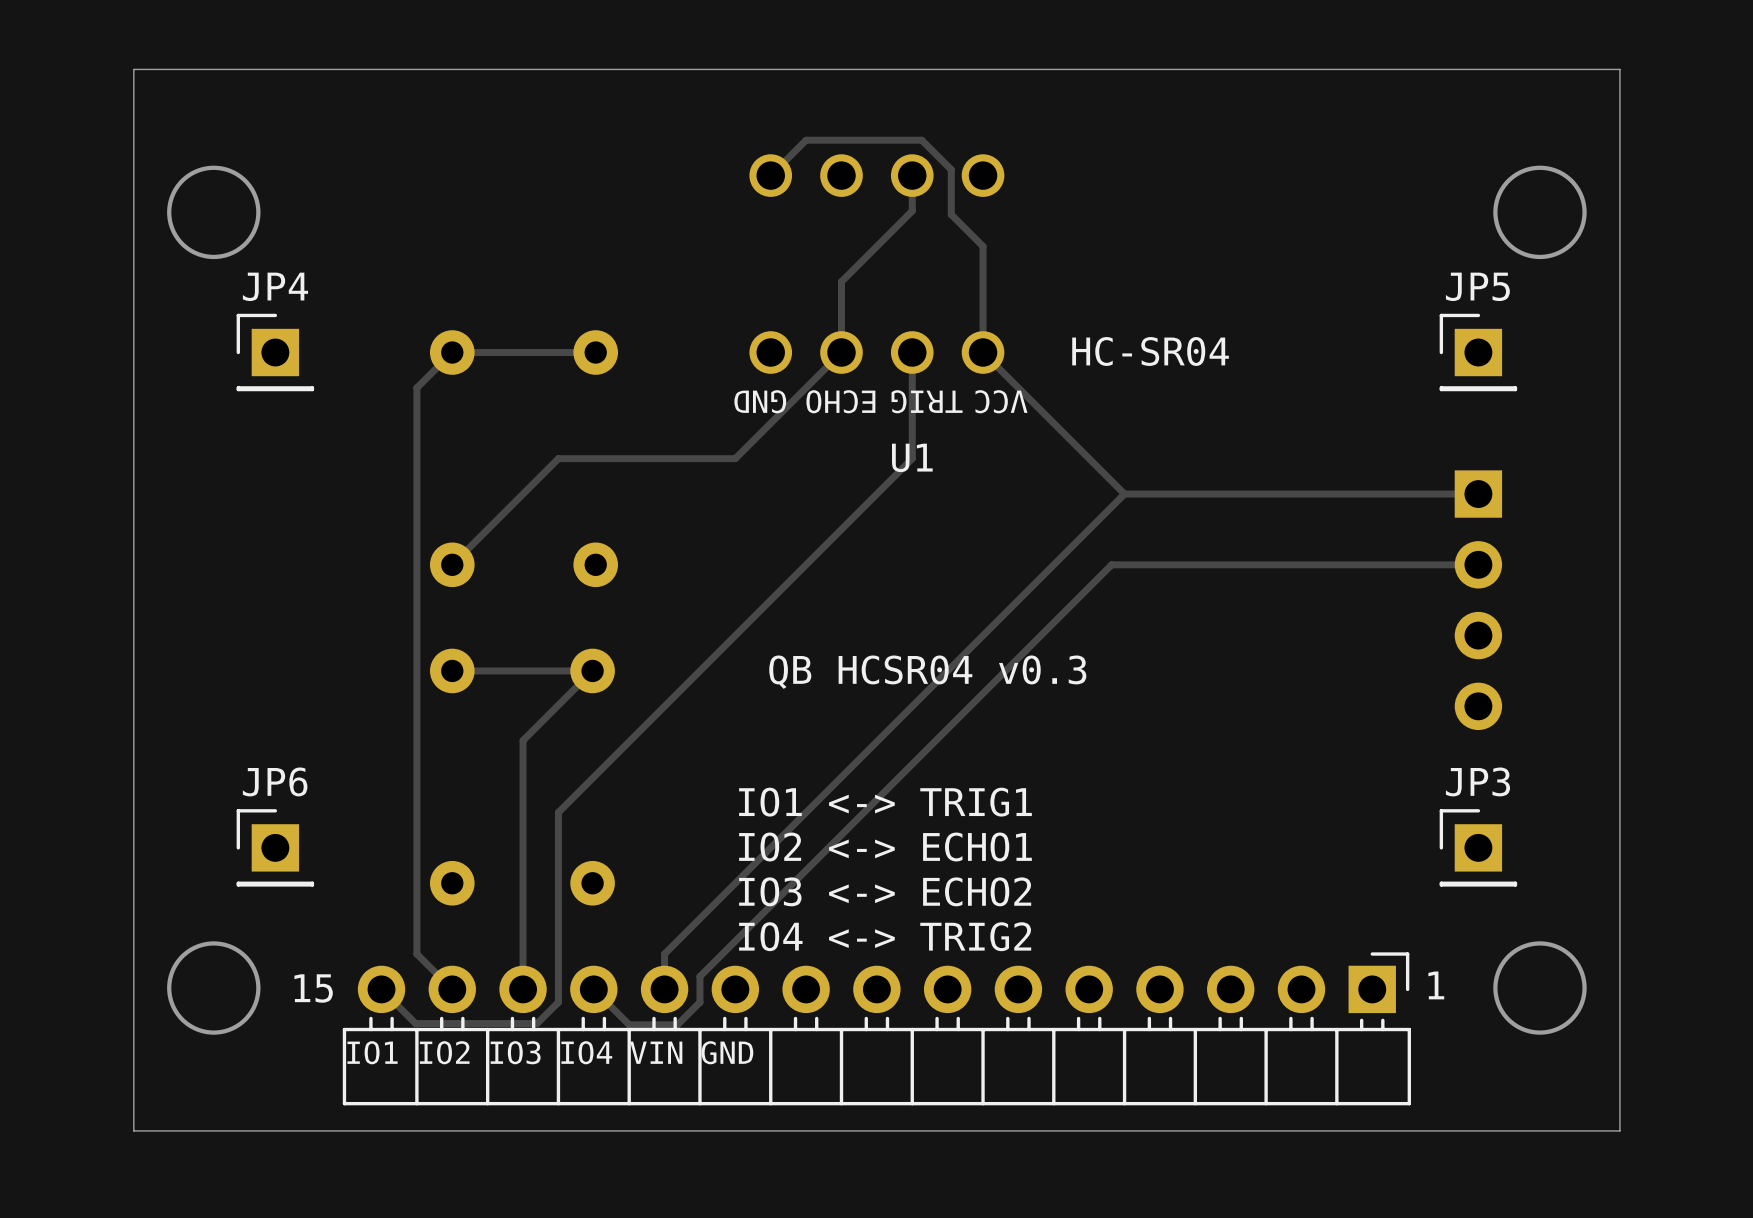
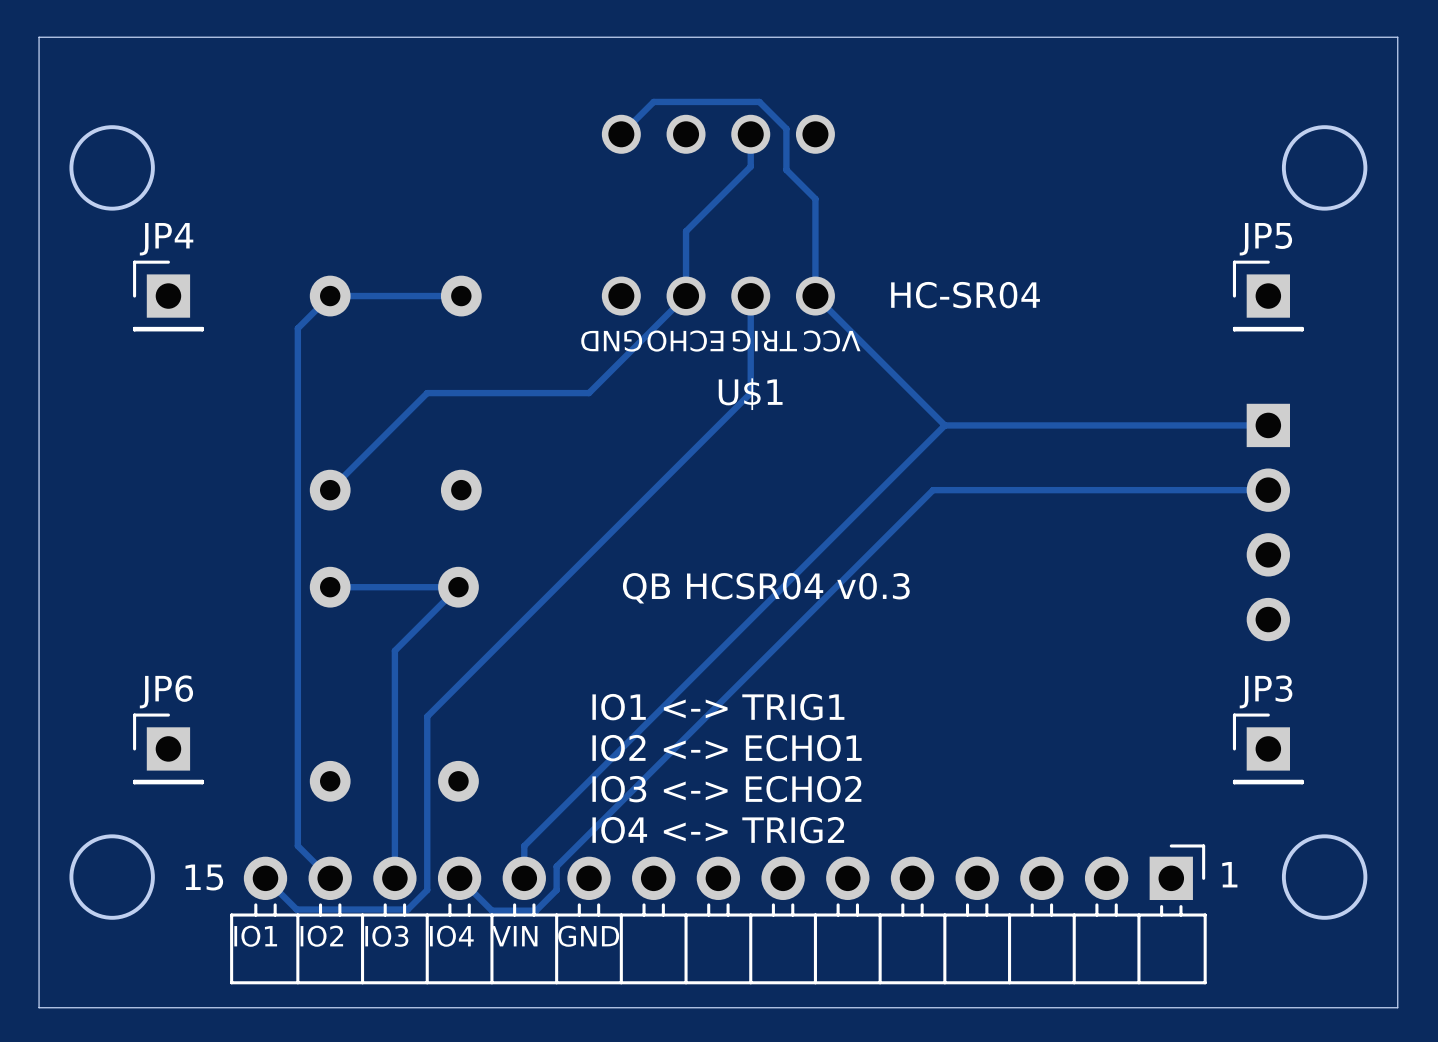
U1 name: U1 (912, 457) -> U$1 (750, 394)

